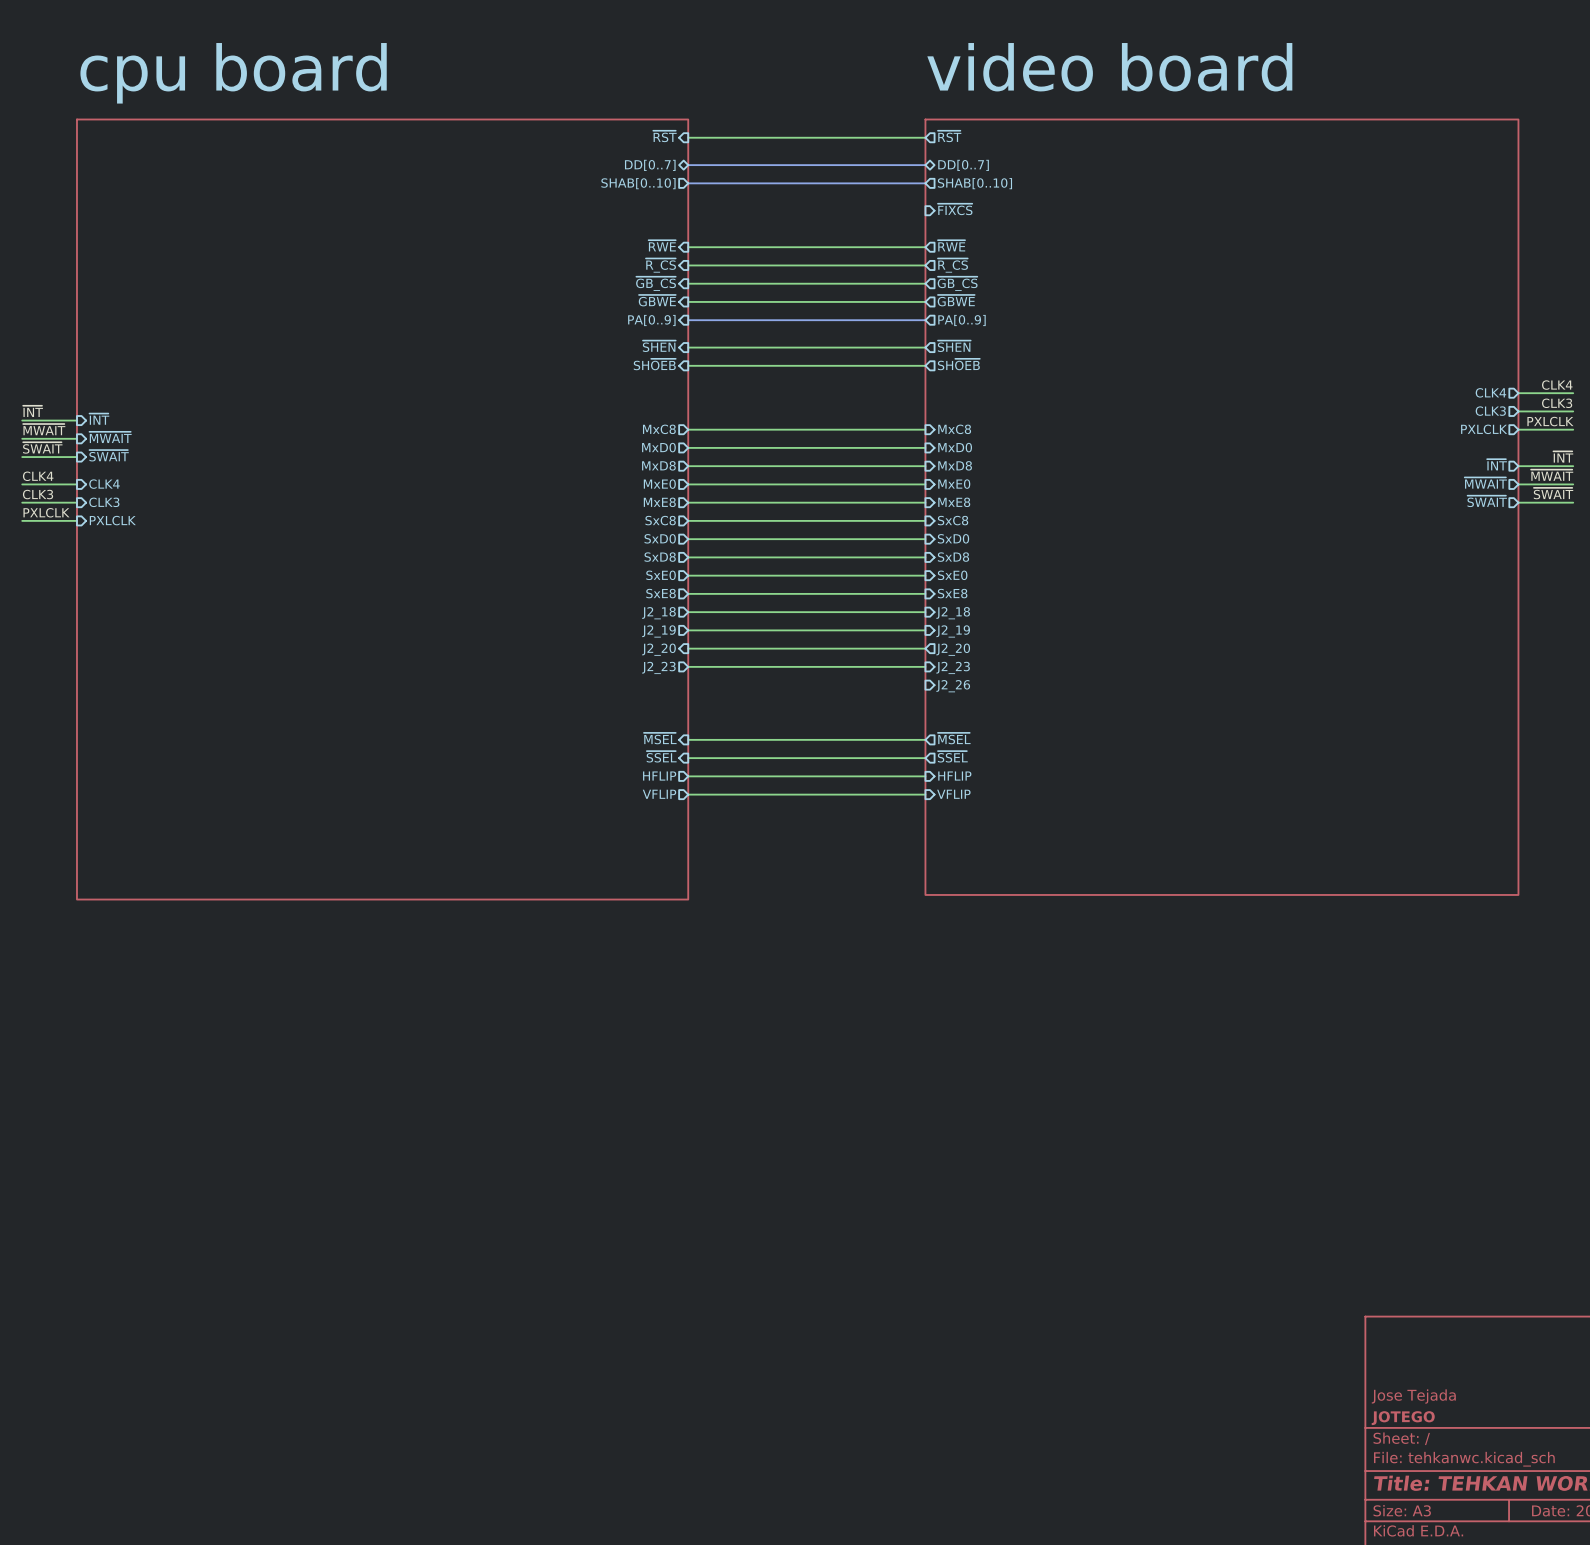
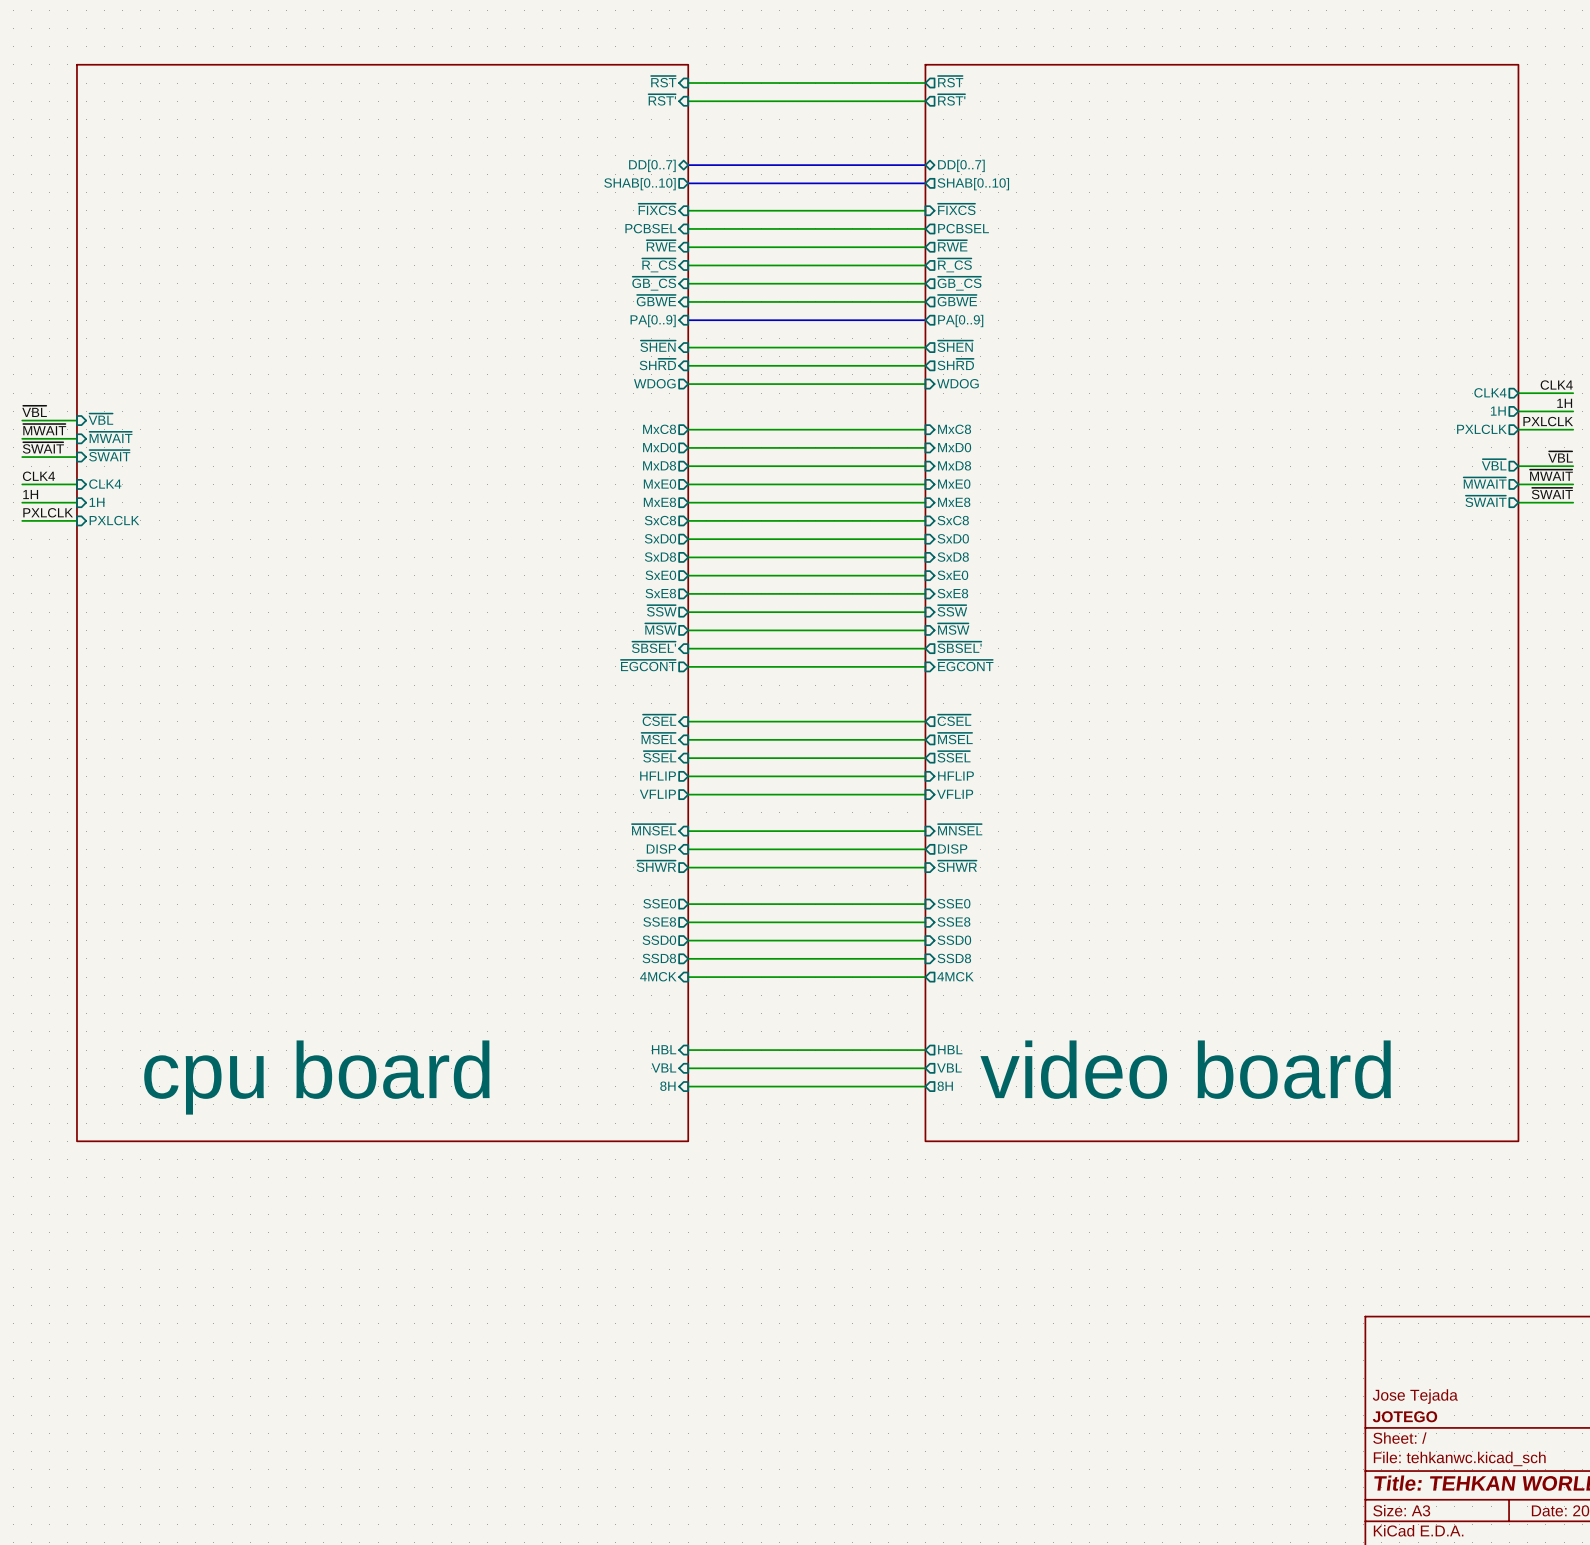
wire: none -> (688, 83) (925, 83)
sheet pin: none -> ~{RST'} (662, 99)
sheet pin: none -> ~{RST'} (951, 99)
sheet pin position: ~{RST} (664, 136) -> ~{RST} (663, 81)
sheet pin position: ~{RST} (949, 136) -> ~{RST} (950, 81)
wire: (688, 137) (925, 137) -> (688, 101) (925, 101)
sheet pin: none -> ~{FIXCS} (657, 209)
wire: none -> (688, 210) (925, 210)
sheet pin: none -> PCBSEL (650, 228)
wire: none -> (688, 228) (925, 228)
sheet pin: none -> PCBSEL (963, 228)
sheet pin: SH~{OEB} (654, 364) -> SH~{RD} (657, 364)
sheet pin: SH~{OEB} (958, 364) -> SH~{RD} (955, 364)
sheet pin: none -> WDOG (654, 383)
sheet pin: none -> WDOG (957, 383)
wire: none -> (688, 384) (925, 384)
label: CLK3 (1557, 403) -> 1H (1564, 403)
label: ~{INT} (33, 411) -> ~{VBL} (34, 411)
sheet pin: CLK3 (1490, 411) -> 1H (1498, 411)
sheet pin: ~{INT} (99, 419) -> ~{VBL} (100, 419)
label: ~{INT} (1563, 456) -> ~{VBL} (1560, 456)
sheet pin: ~{INT} (1496, 464) -> ~{VBL} (1494, 464)
label: CLK3 (38, 494) -> 1H (30, 494)
sheet pin: CLK3 (104, 502) -> 1H (97, 502)
sheet video board: (1221, 507) -> none
sheet cpu board: (382, 509) -> none
sheet cpu board: none -> (382, 603)
sheet video board: none -> (1221, 603)
sheet pin: J2_18 (658, 613) -> ~{SSW} (661, 610)
sheet pin: J2_18 (953, 613) -> ~{SSW} (952, 610)
sheet pin: J2_19 (658, 631) -> ~{MSW} (660, 629)
sheet pin: J2_19 (953, 631) -> ~{MSW} (953, 629)
sheet pin: J2_20 (658, 649) -> ~{SBSEL'} (653, 647)
sheet pin: J2_20 (953, 649) -> ~{SBSEL'} (959, 647)
sheet pin: J2_23 (658, 667) -> ~{EGCONT} (648, 665)
sheet pin: J2_23 (953, 667) -> ~{EGCONT} (965, 665)
sheet pin: J2_26 (953, 686) -> none
sheet pin: none -> ~{CSEL} (659, 720)
sheet pin: none -> ~{CSEL} (954, 720)
wire: none -> (688, 721) (925, 721)
sheet pin: none -> ~{MNSEL} (654, 829)
sheet pin: none -> ~{MNSEL} (960, 829)
wire: none -> (688, 831) (925, 831)
sheet pin: none -> DISP (661, 849)
wire: none -> (688, 849) (925, 849)
sheet pin: none -> DISP (952, 849)
sheet pin: none -> ~{SHWR} (656, 866)
sheet pin: none -> ~{SHWR} (957, 866)
wire: none -> (688, 867) (925, 867)
sheet pin: none -> SSE0 (659, 903)
sheet pin: none -> SSE0 (954, 903)
wire: none -> (688, 904) (925, 904)
sheet pin: none -> SSE8 (659, 922)
wire: none -> (688, 922) (925, 922)
sheet pin: none -> SSE8 (953, 922)
sheet pin: none -> SSD0 (659, 940)
wire: none -> (688, 940) (925, 940)
sheet pin: none -> SSD0 (954, 940)
sheet pin: none -> SSD8 (659, 958)
wire: none -> (688, 958) (925, 958)
sheet pin: none -> SSD8 (954, 958)
sheet pin: none -> 4MCK (658, 976)
sheet pin: none -> 4MCK (955, 976)
wire: none -> (688, 977) (925, 977)
sheet pin: none -> HBL (664, 1049)
sheet pin: none -> HBL (950, 1049)
wire: none -> (688, 1050) (925, 1050)
sheet pin: none -> VBL (663, 1067)
sheet pin: none -> VBL (949, 1067)
wire: none -> (688, 1068) (925, 1068)
sheet pin: none -> 8H (667, 1086)
wire: none -> (688, 1086) (925, 1086)
sheet pin: none -> 8H (945, 1086)

